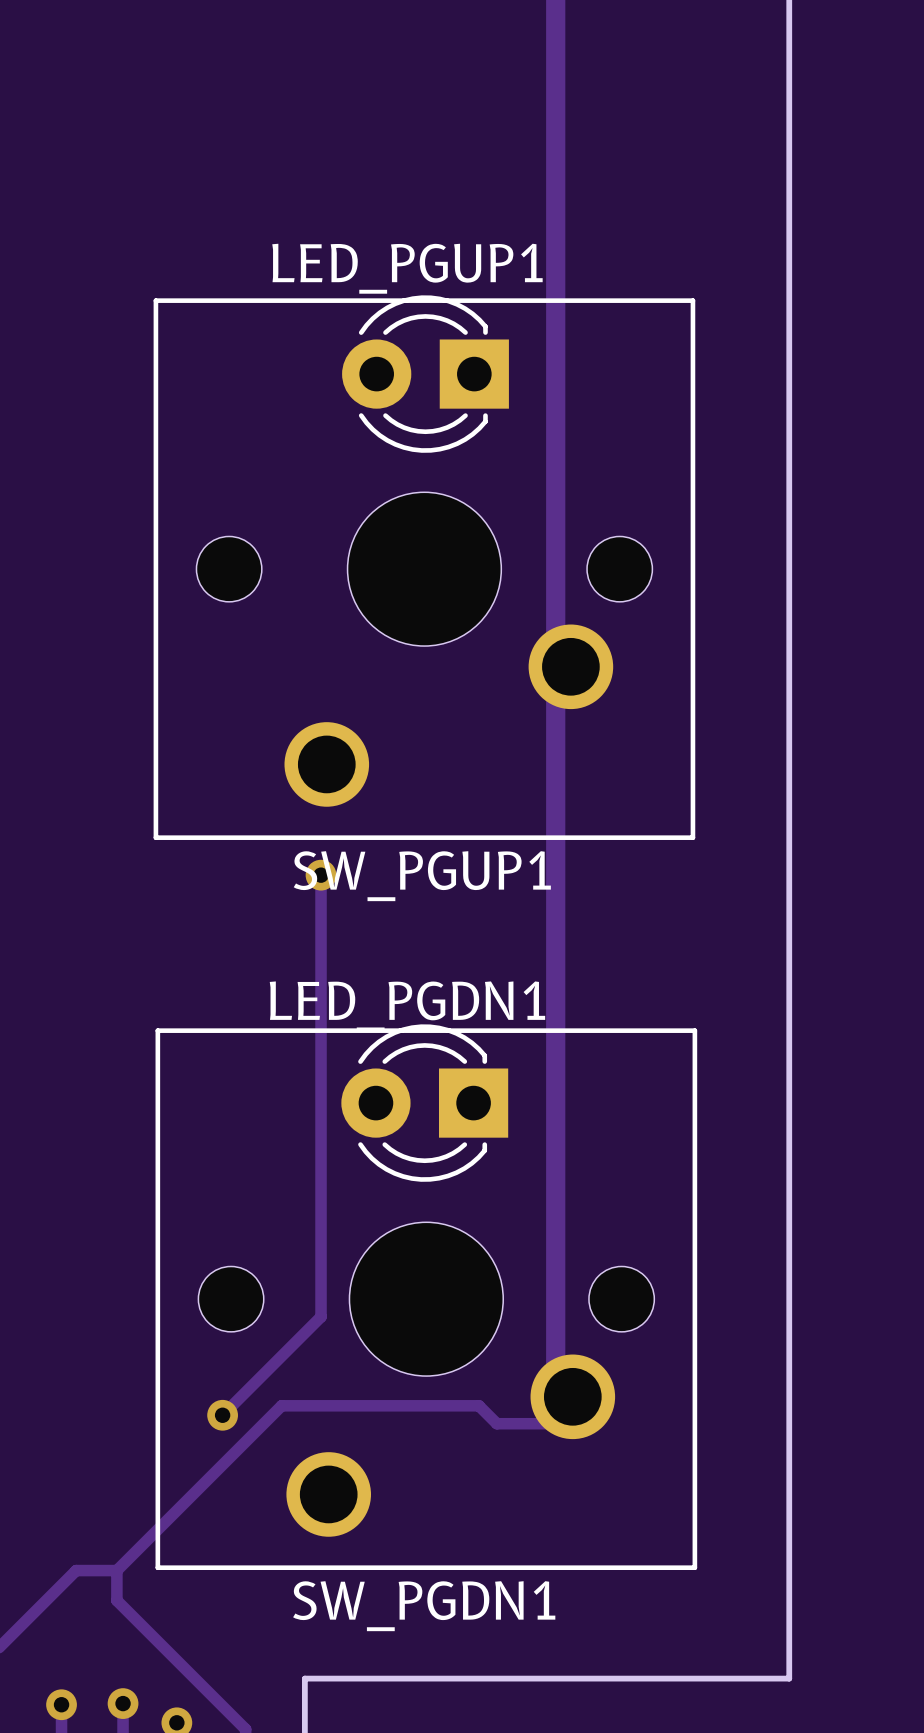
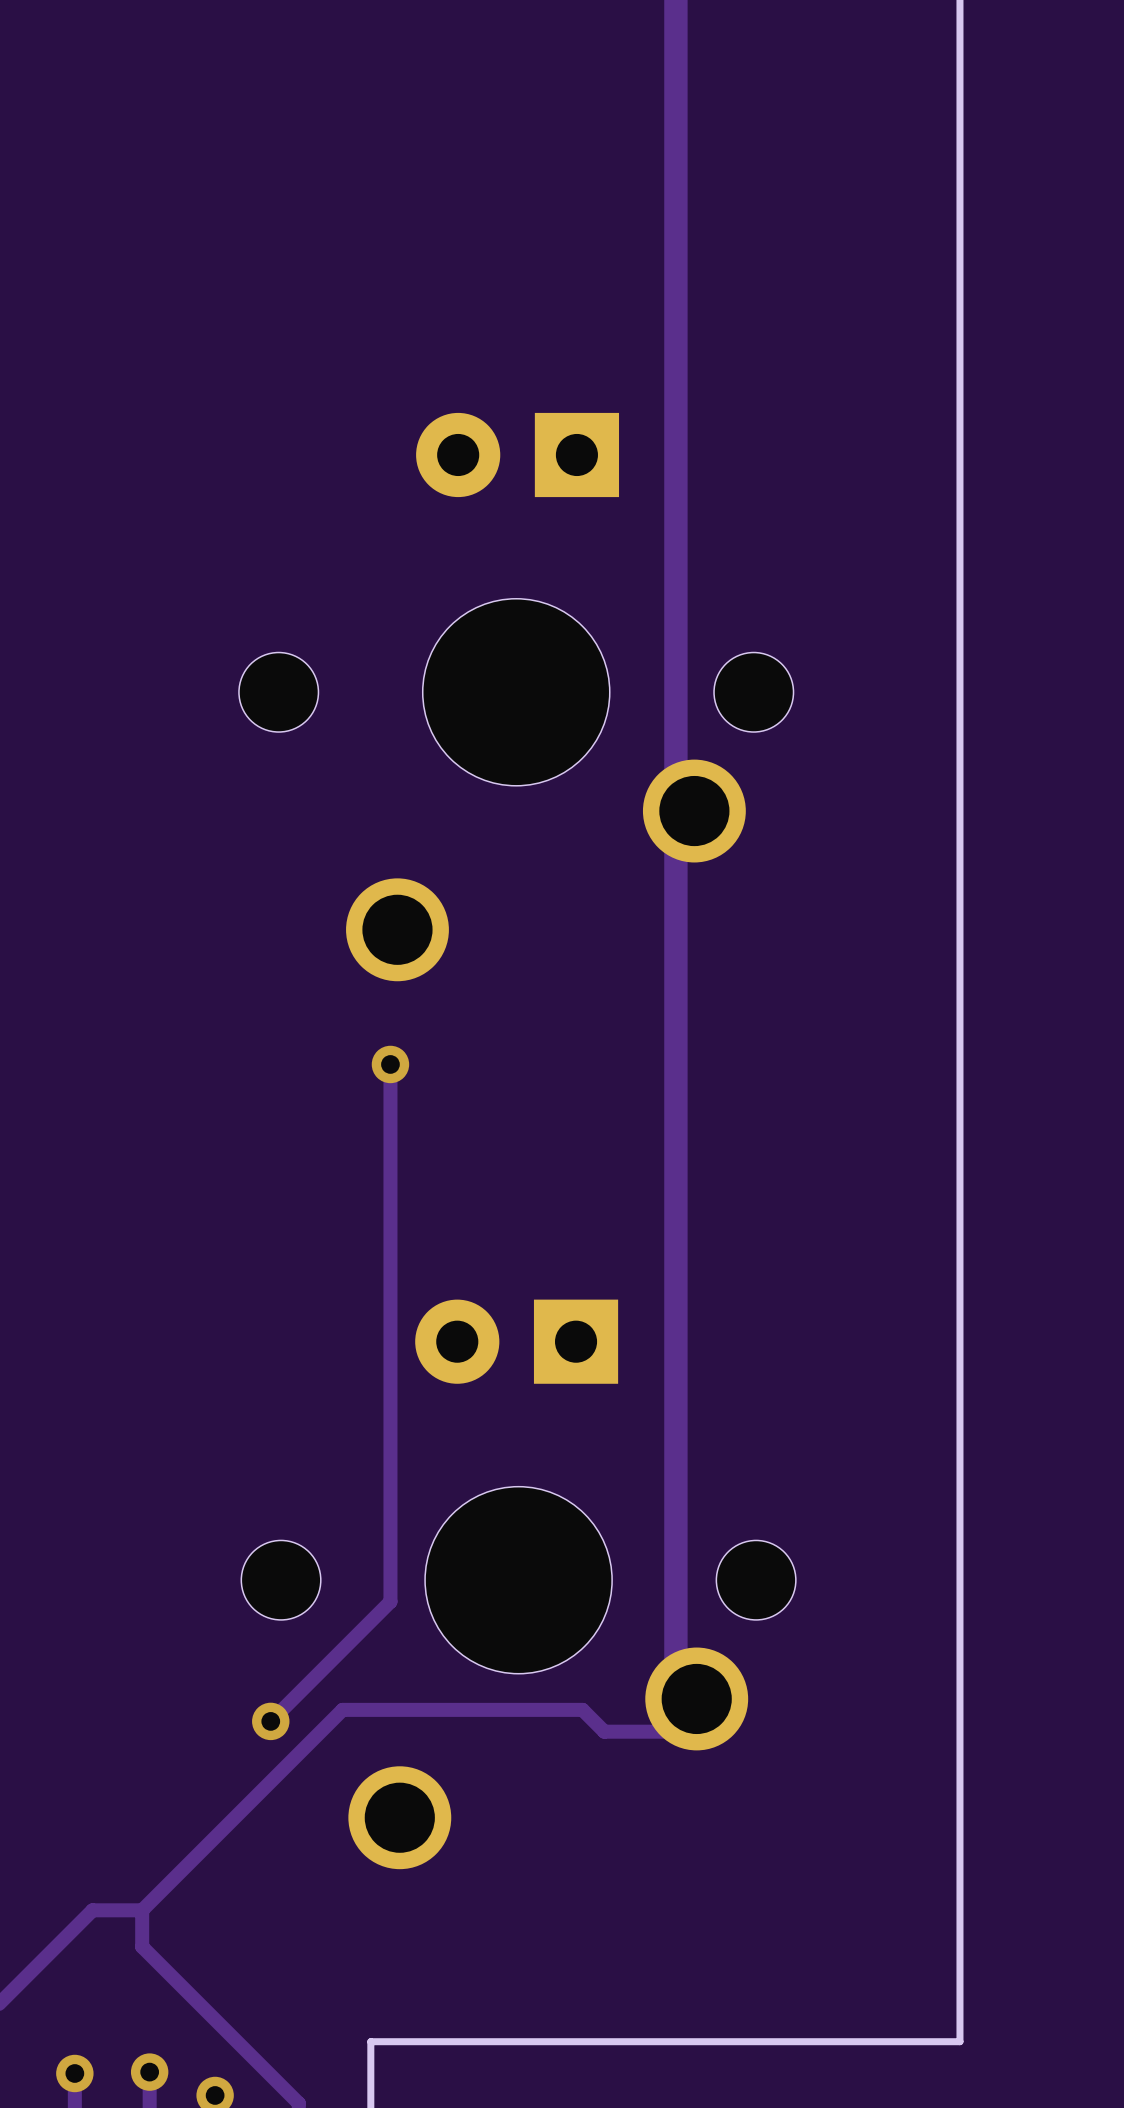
LED_PGUP1: (425, 374) -> none
SW_PGUP1: (424, 569) -> none
LED_PGDN1: (424, 1103) -> none
SW_PGDN1: (426, 1299) -> none

